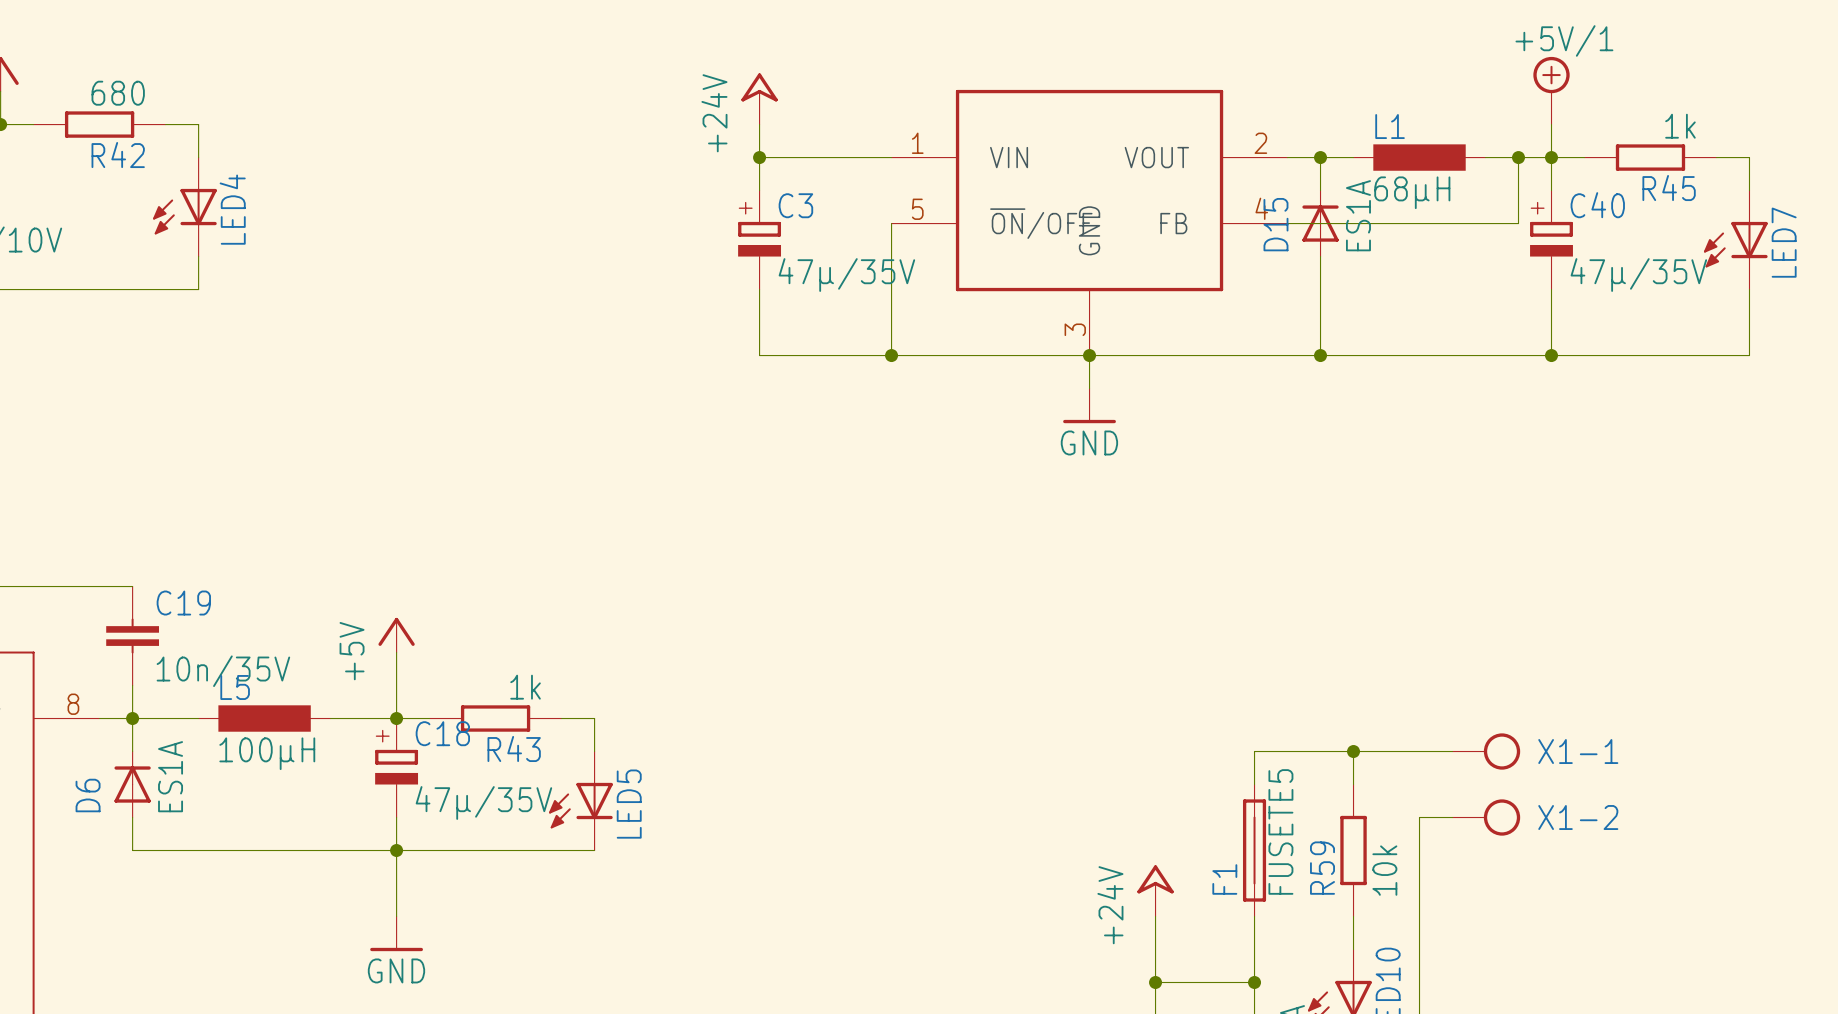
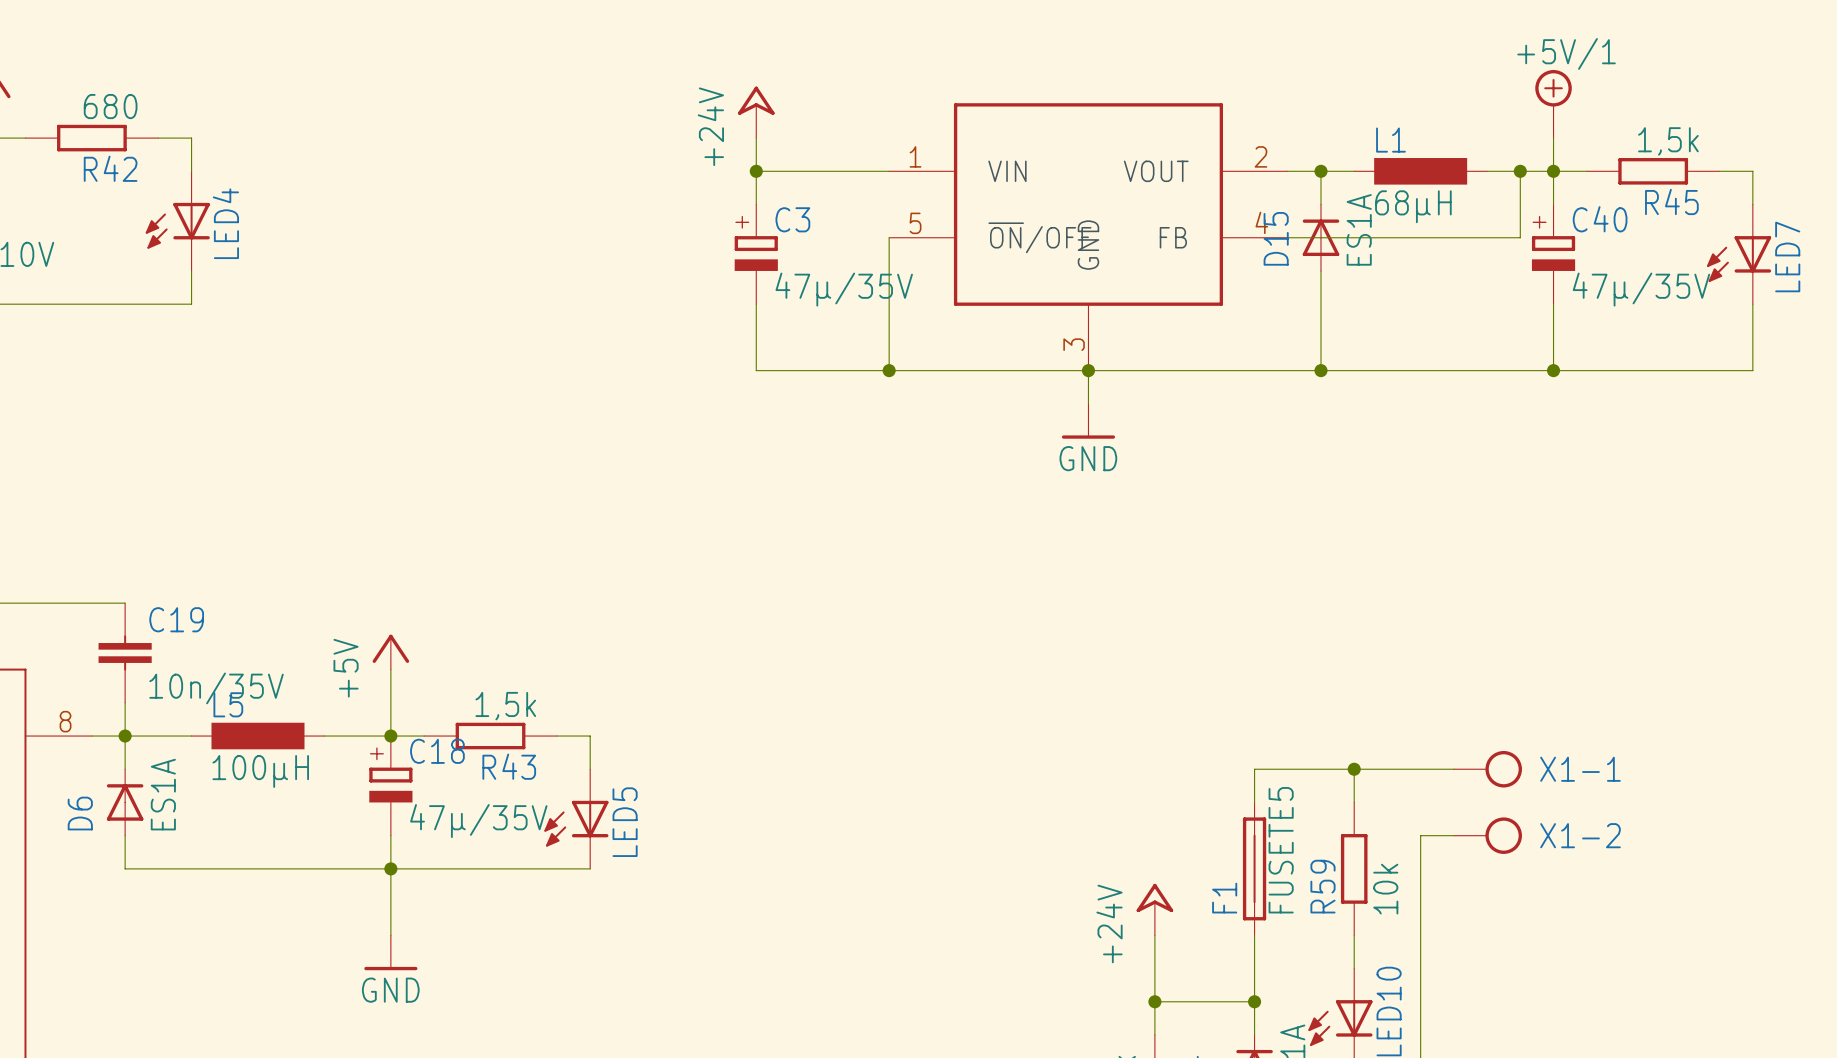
R45 value: 1k (1680, 126) -> 1,5k (1668, 141)
R43 value: 1k (525, 687) -> 1,5k (505, 706)

